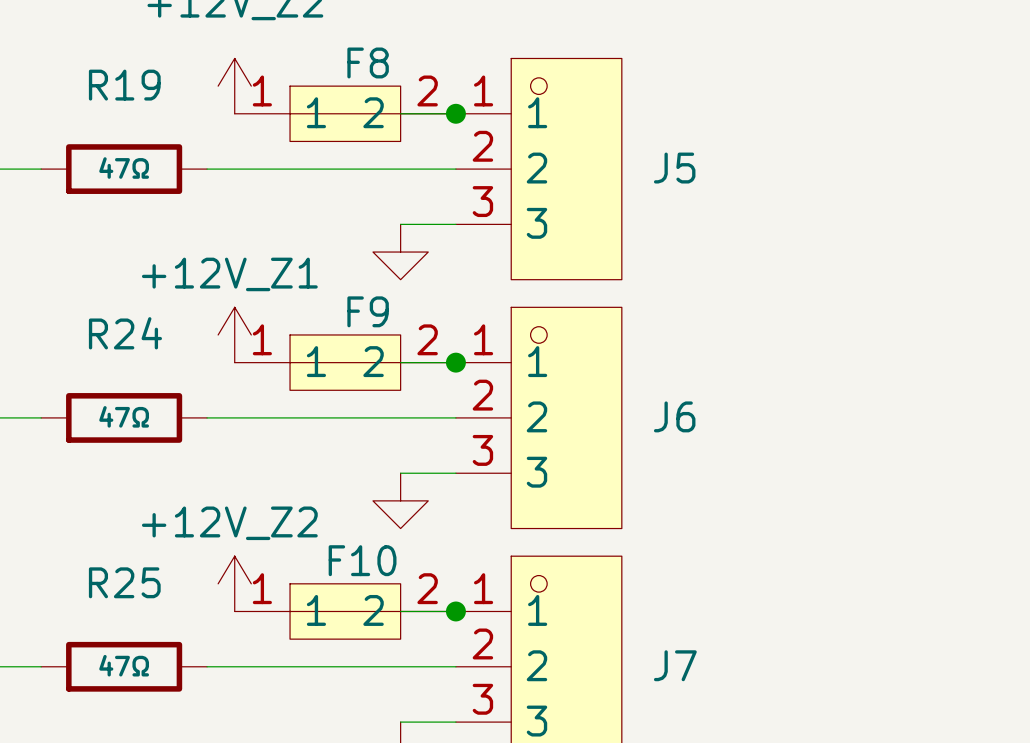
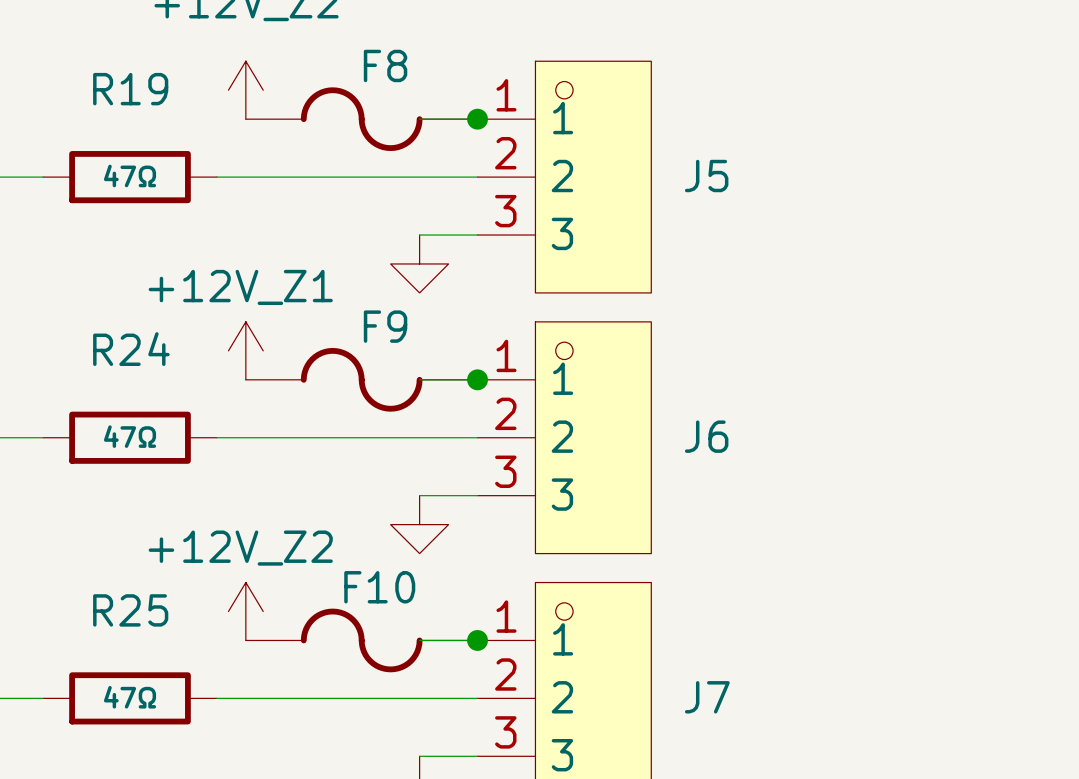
F8 symbol: [234, 86, 456, 142] -> [245, 87, 478, 152]
F9 symbol: [234, 334, 456, 391] -> [245, 347, 478, 412]
F10 symbol: [234, 583, 456, 640] -> [245, 608, 478, 673]

